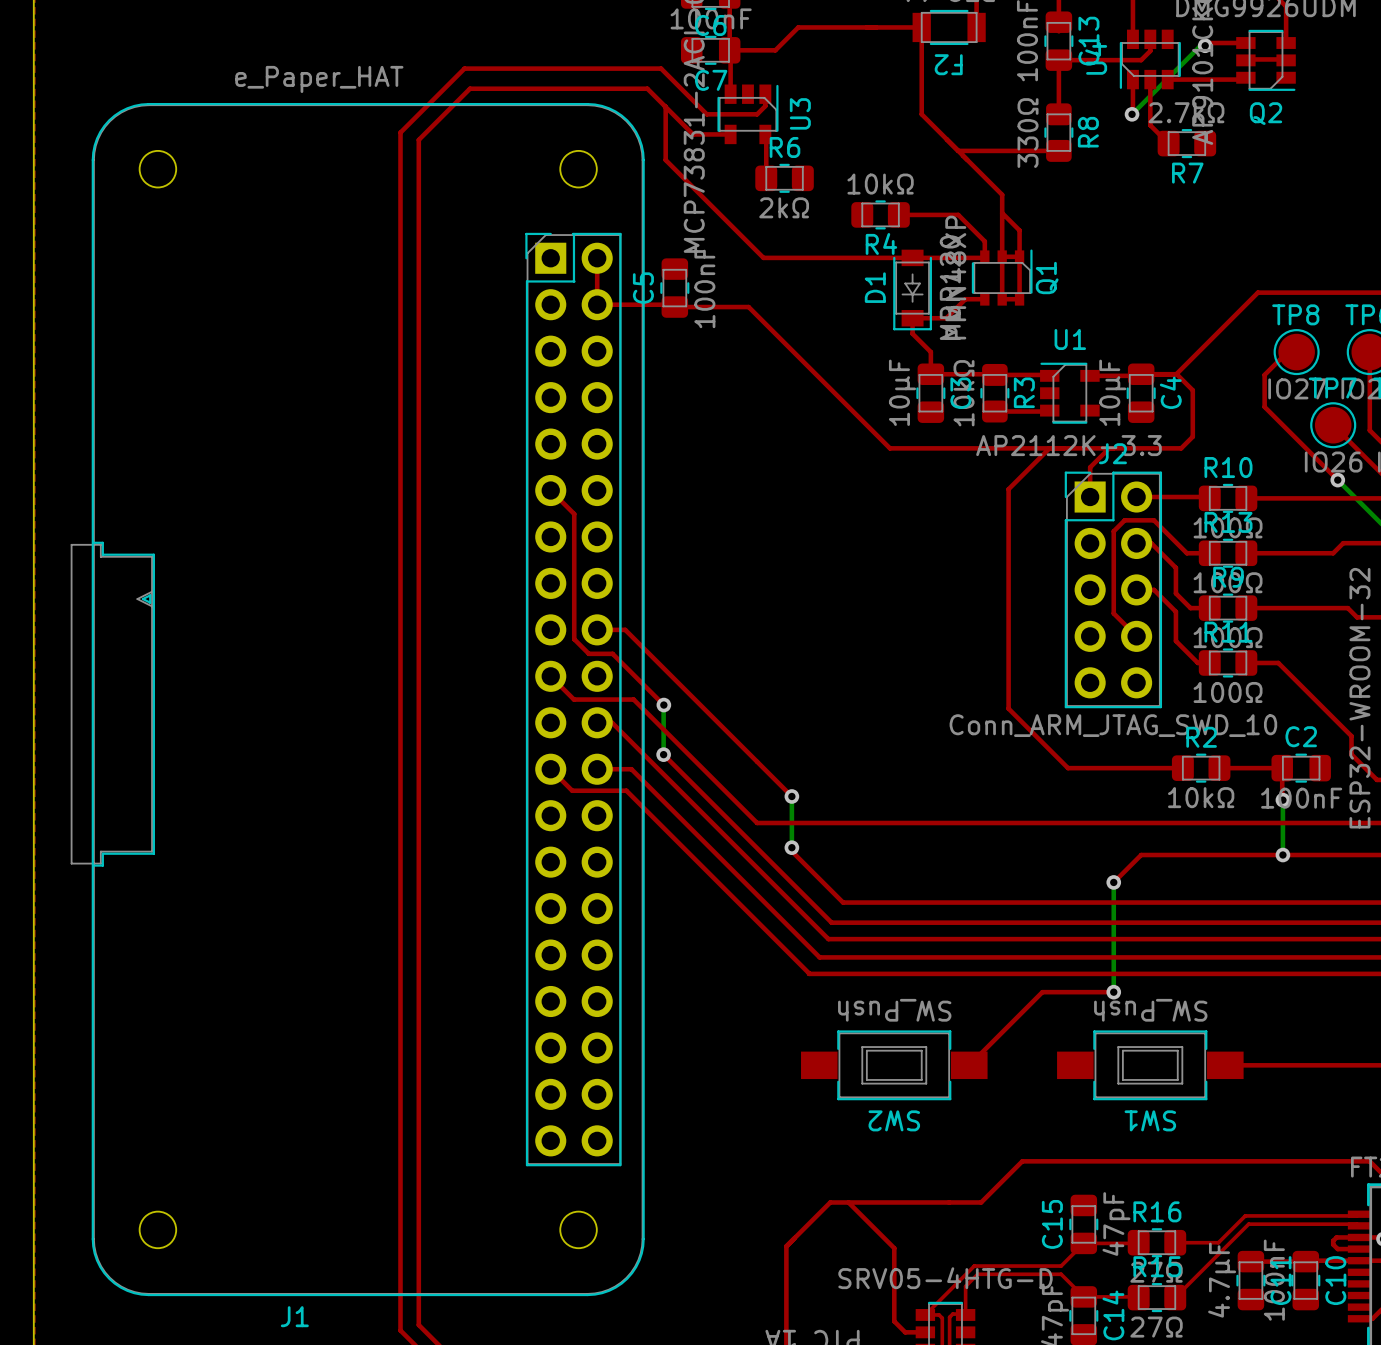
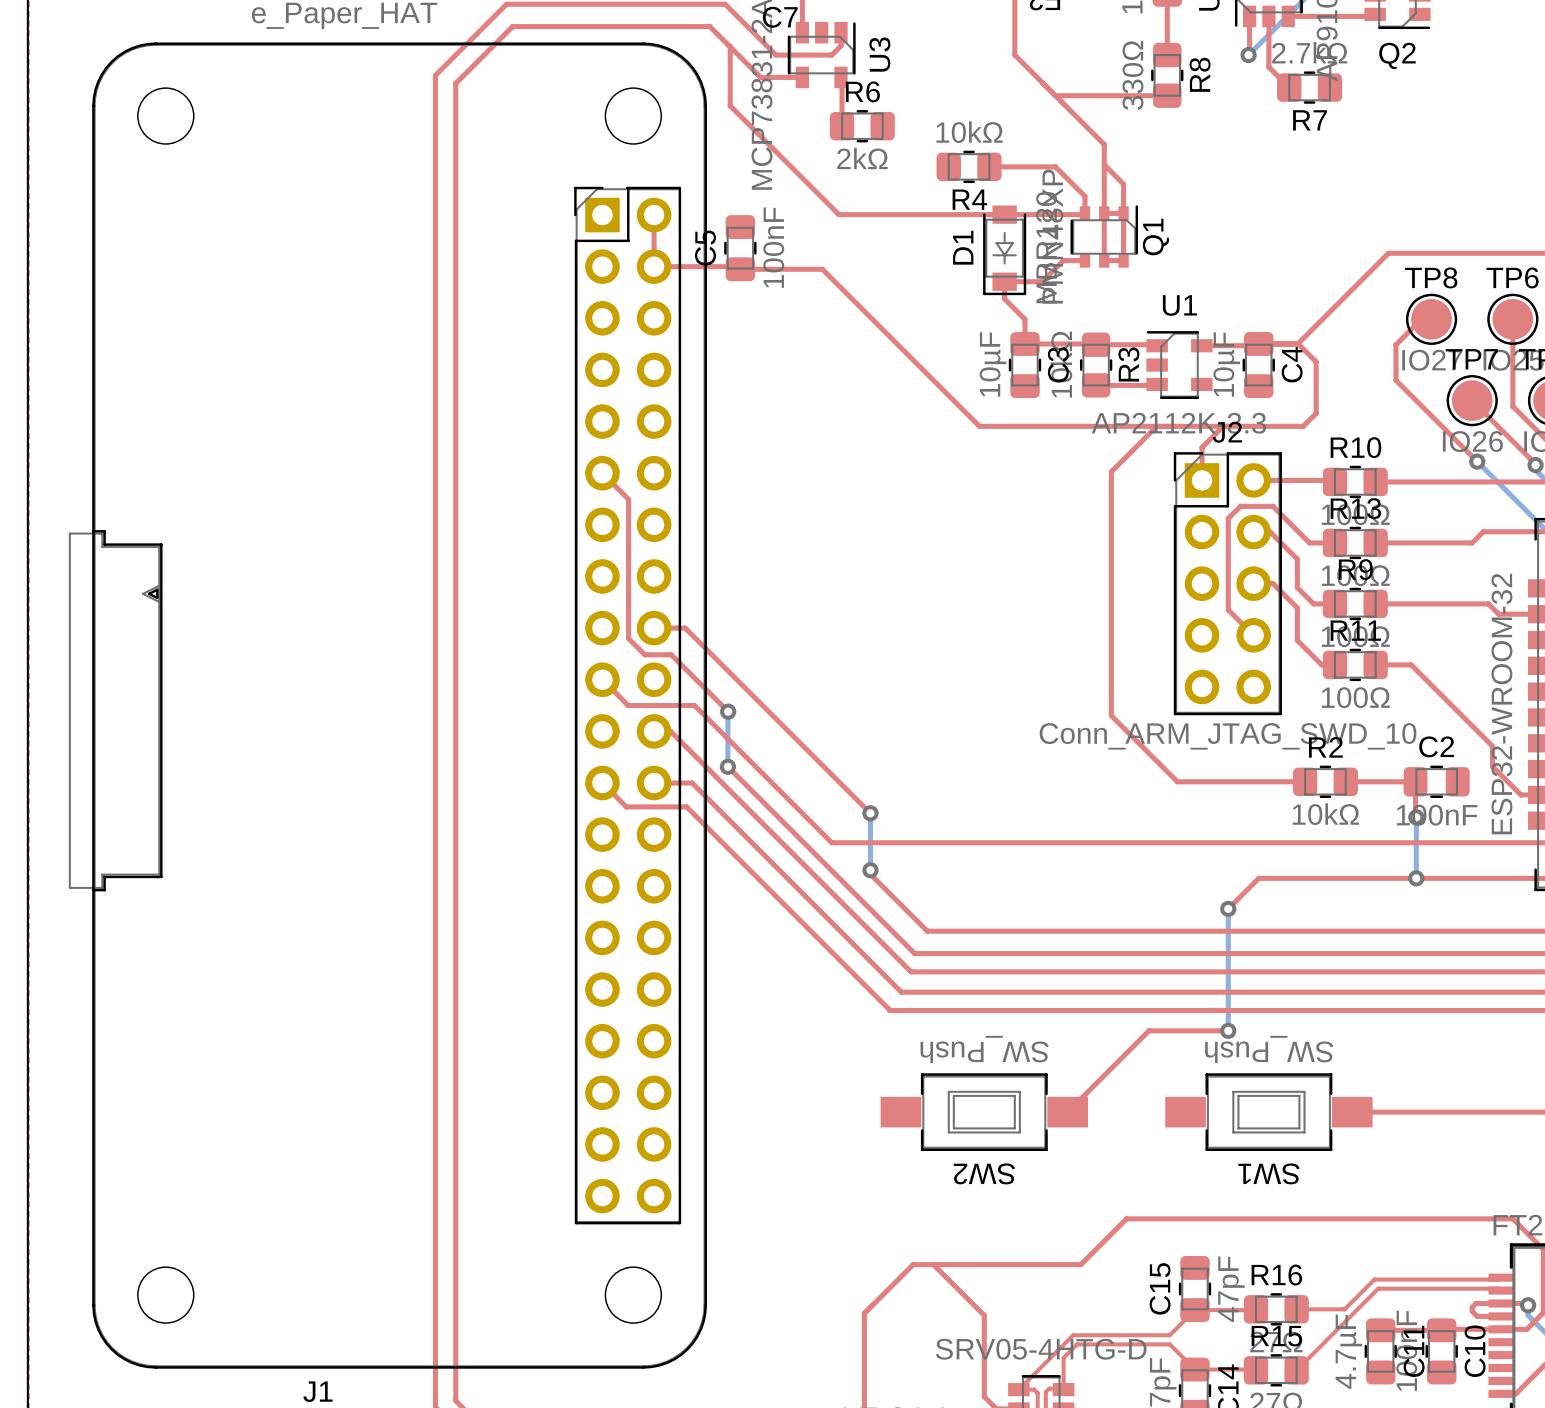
J1 footprint: [70, 102, 645, 1297] -> [68, 42, 707, 1369]

